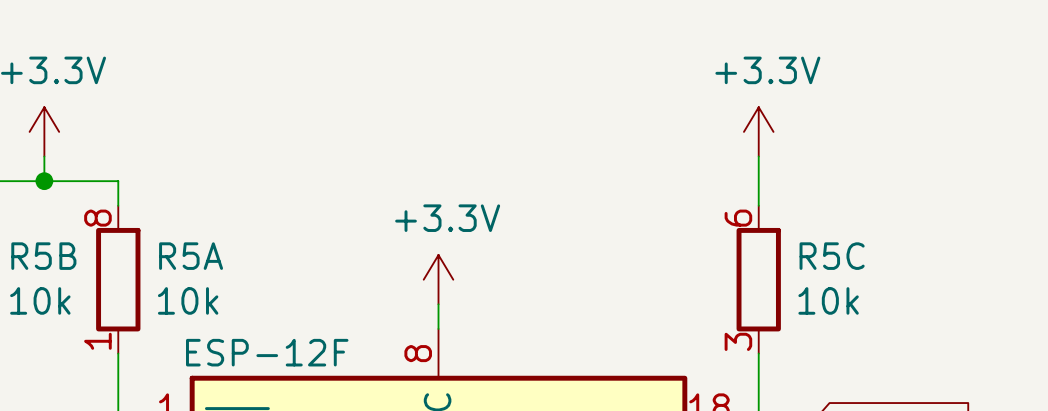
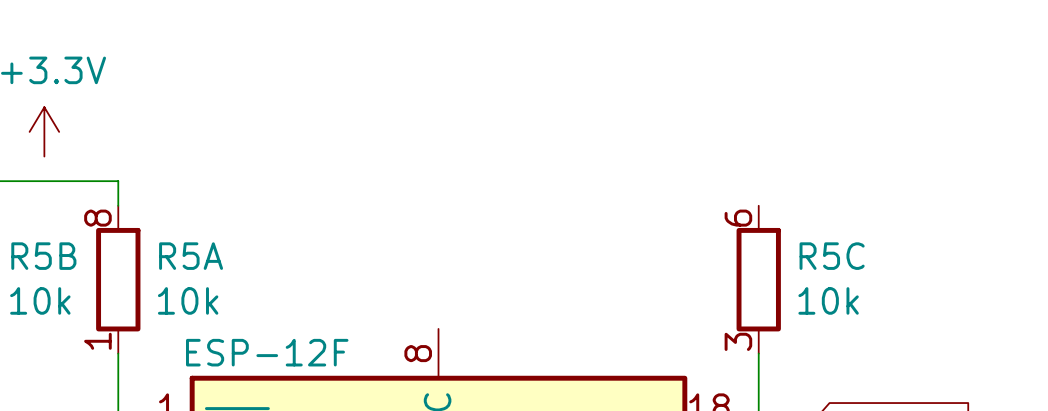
power symbol: +3.3V (758, 131) -> none
wire: (44, 156) (44, 181) -> none
wire: (758, 156) (758, 205) -> none
junction: (44, 181) -> none
power symbol: +3.3V (438, 279) -> none
wire: (438, 304) (438, 328) -> none

